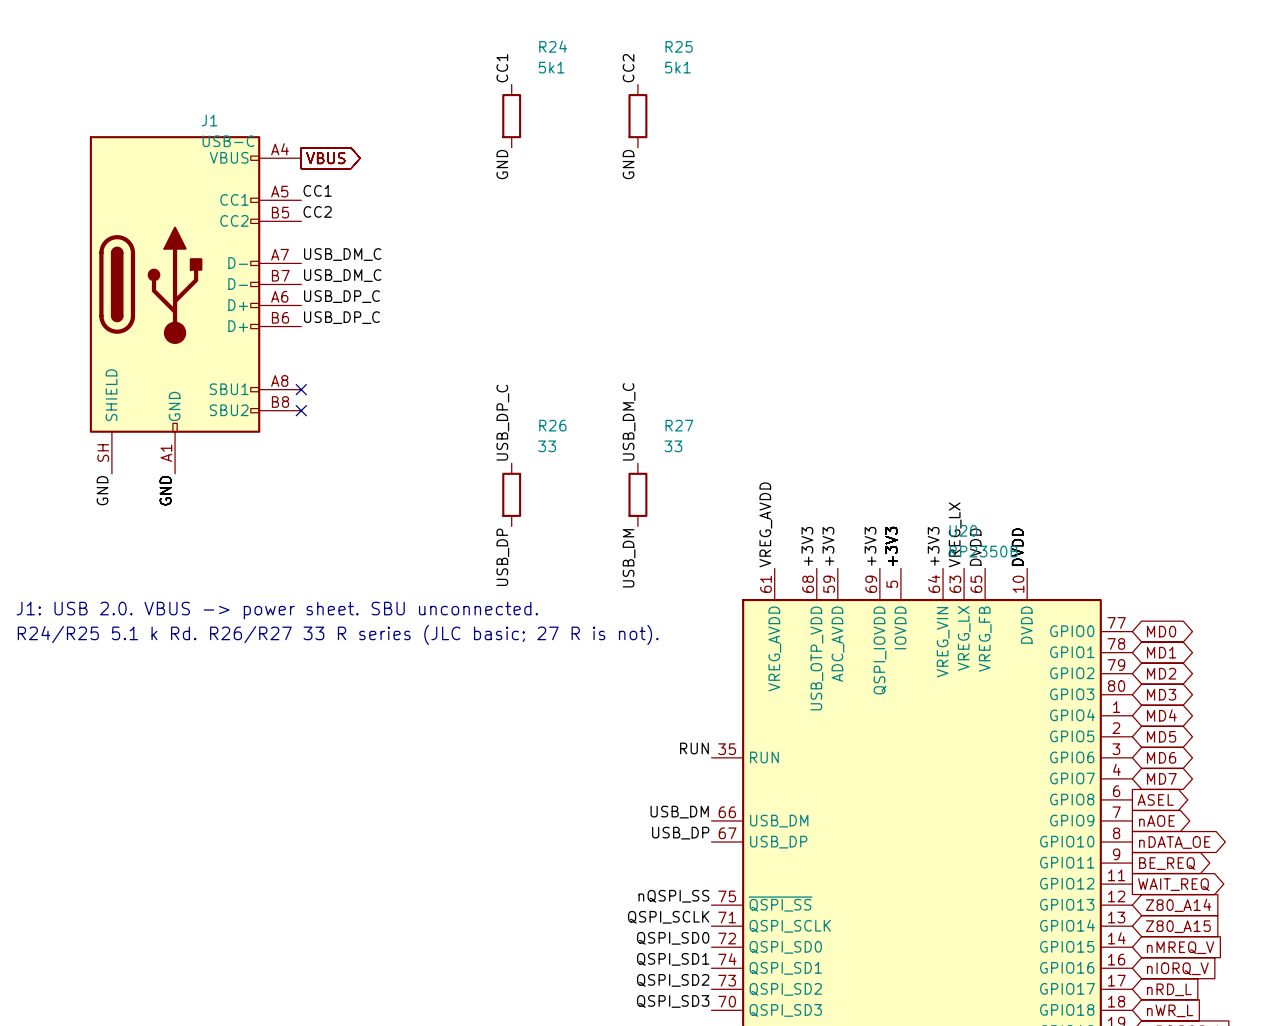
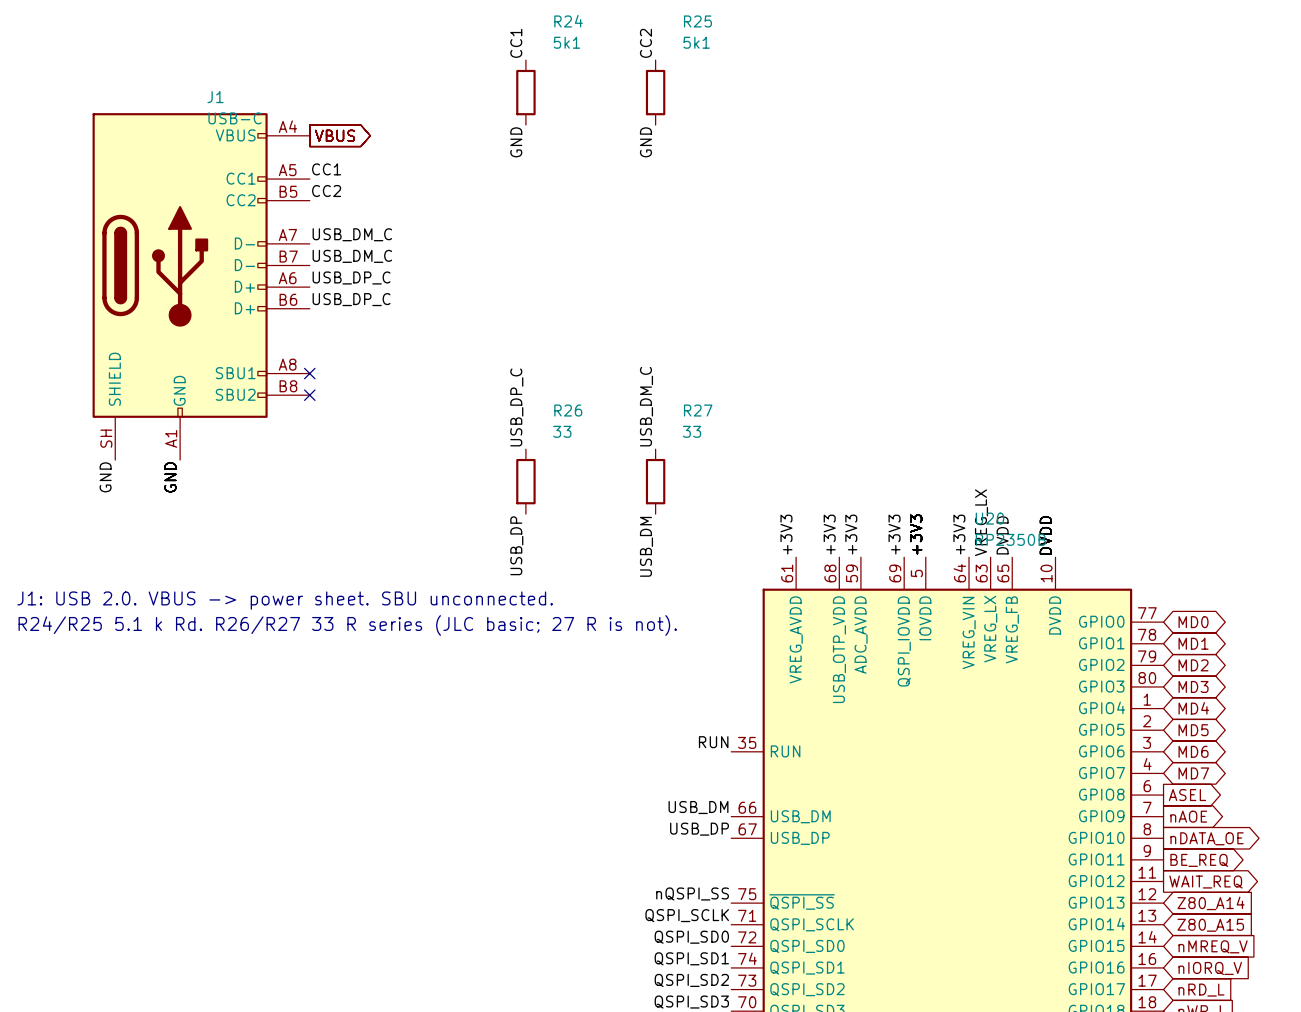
label: VREG_AVDD (765, 524) -> +3V3 (786, 534)

